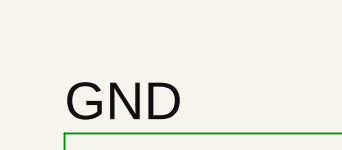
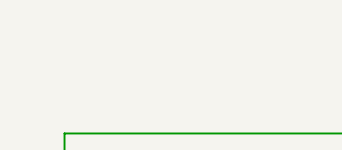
label: GND (123, 100) -> none

